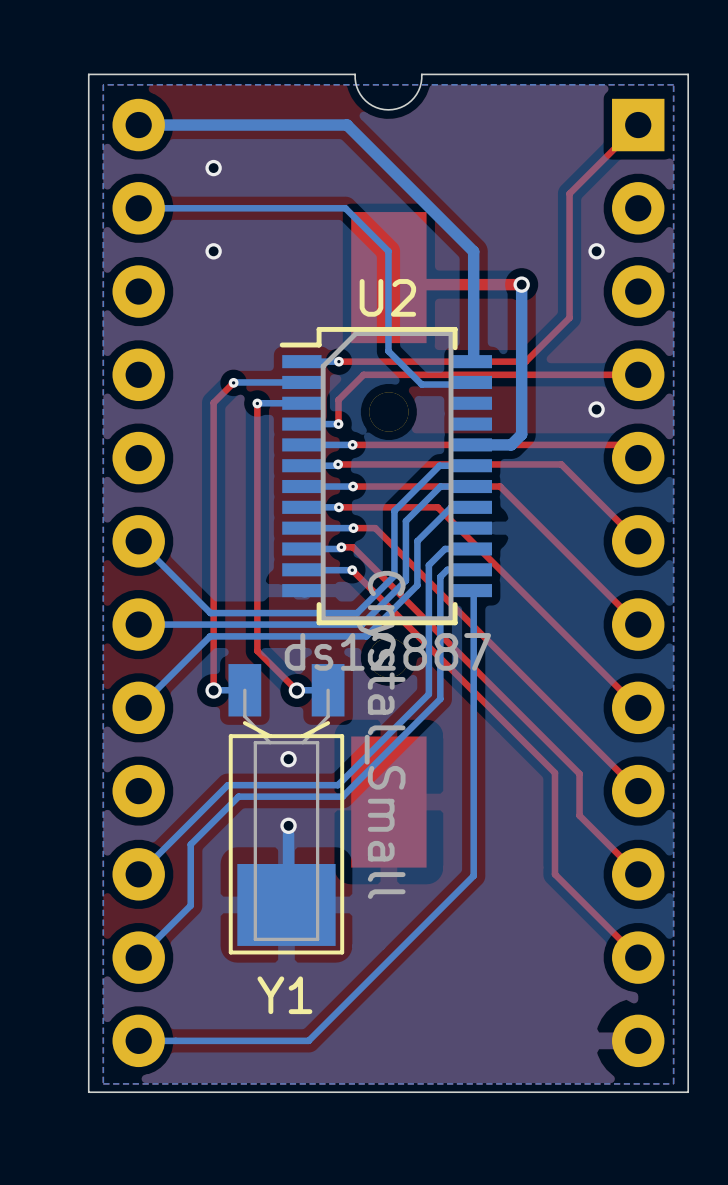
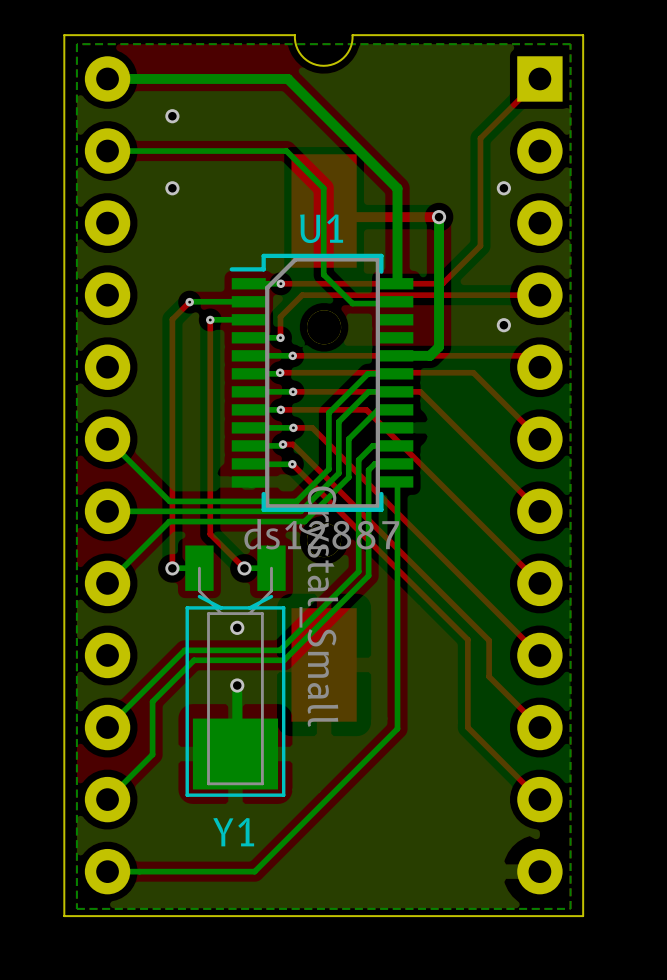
U2 name: U2 (387, 297) -> U1 (321, 228)

